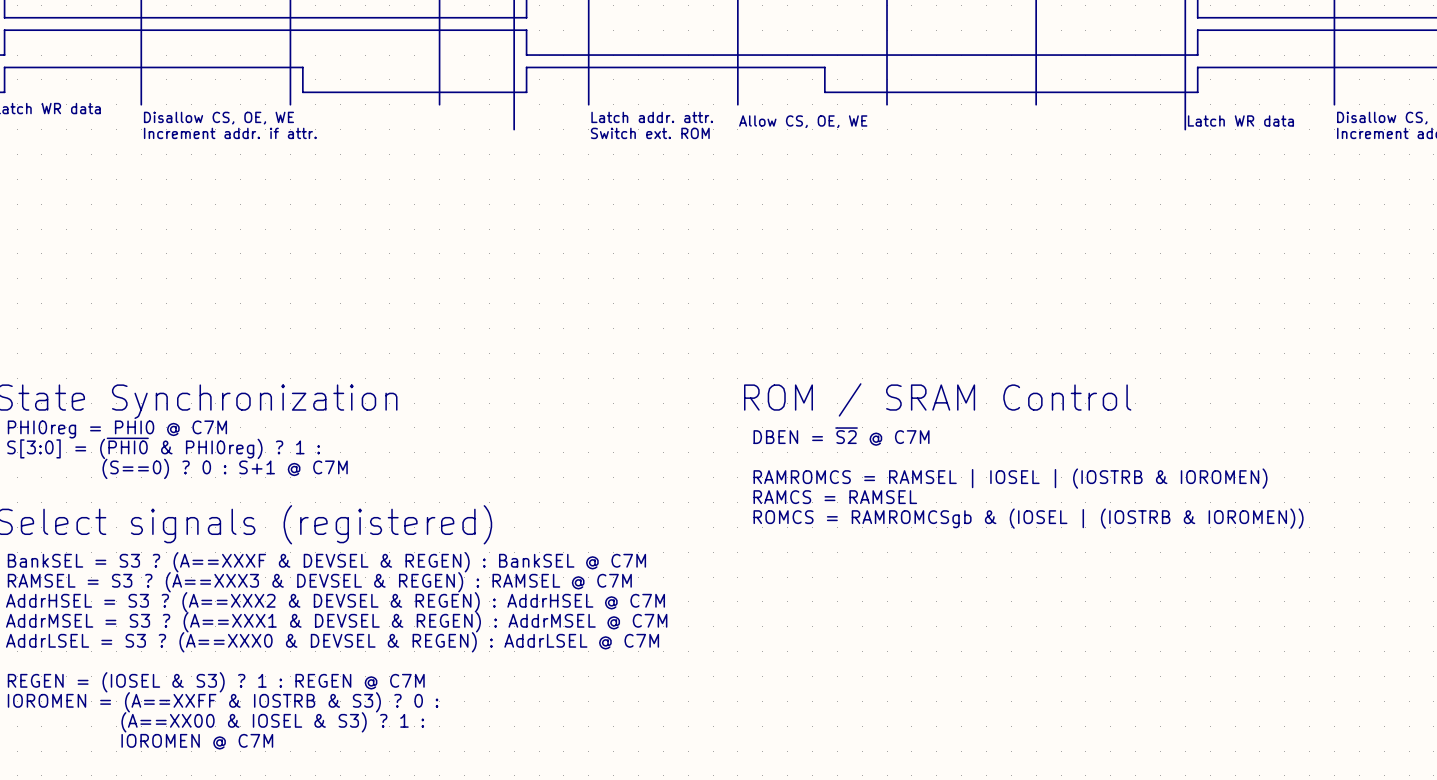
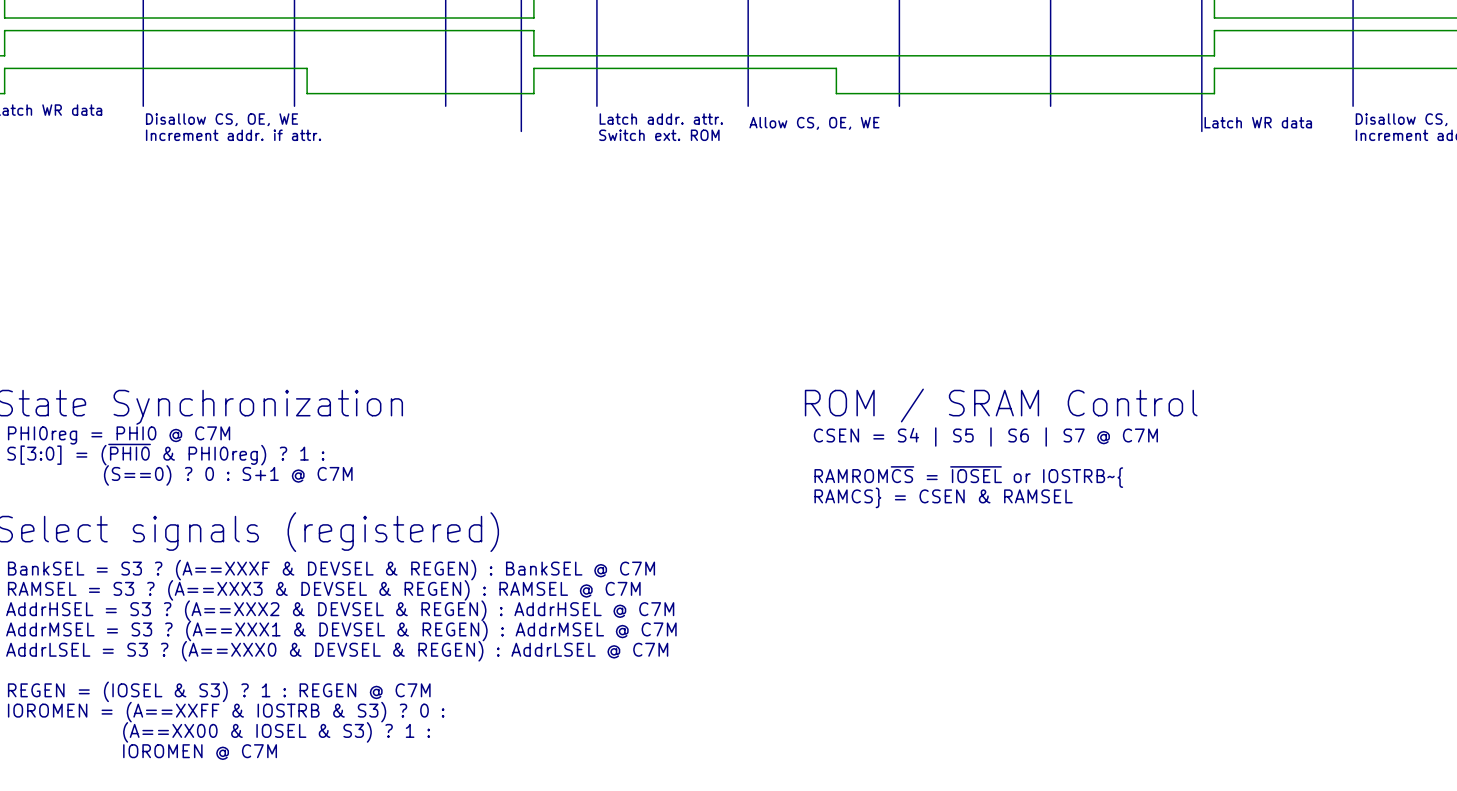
text position: ROM / SRAM Control (937, 399) -> ROM / SRAM Control (1001, 405)
text: none -> CSEN = S4 | S5 | S6 | S7 @ C7M (985, 437)
text: DBEN = ~{S2} @ C7M (841, 436) -> none
text: none -> RAMROM~{CS} = ~{IOSEL} or IOSTRB~{ (968, 477)
text: RAMROMCS = RAMSEL | IOSEL | (IOSTRB & IOROMEN) (1010, 478) -> none
text: RAMCS = RAMSEL (835, 497) -> RAMCS} = CSEN & RAMSEL (943, 497)
text: ROMCS = RAMROMCSgb & (IOSEL | (IOSTRB & IOROMEN)) (1028, 518) -> none

